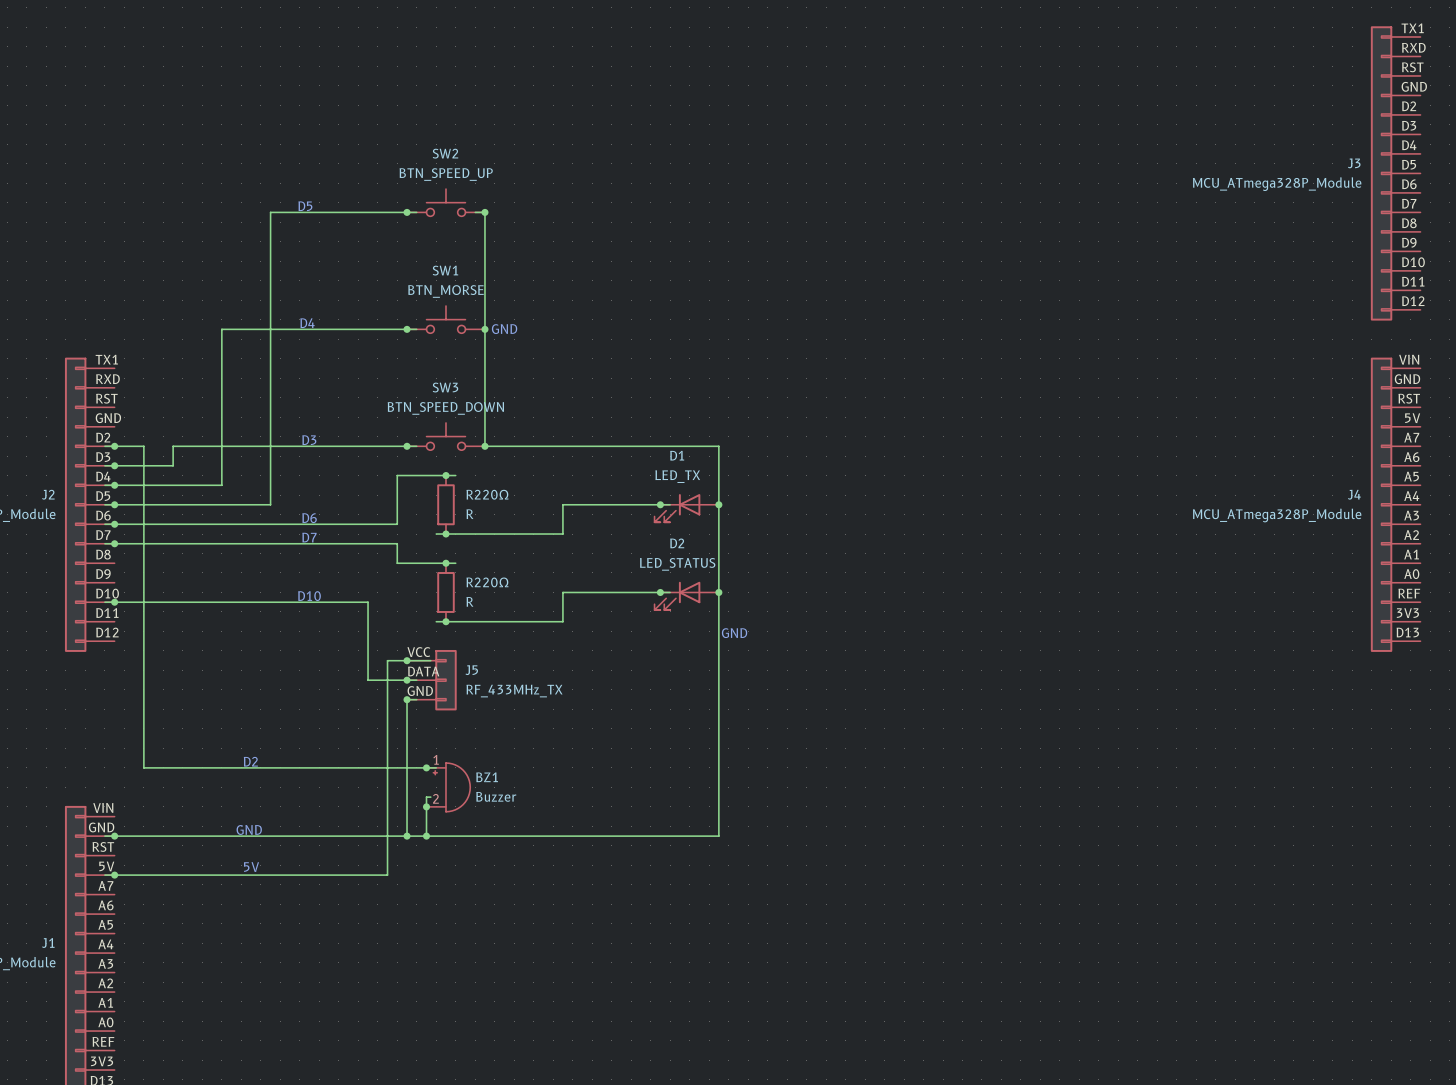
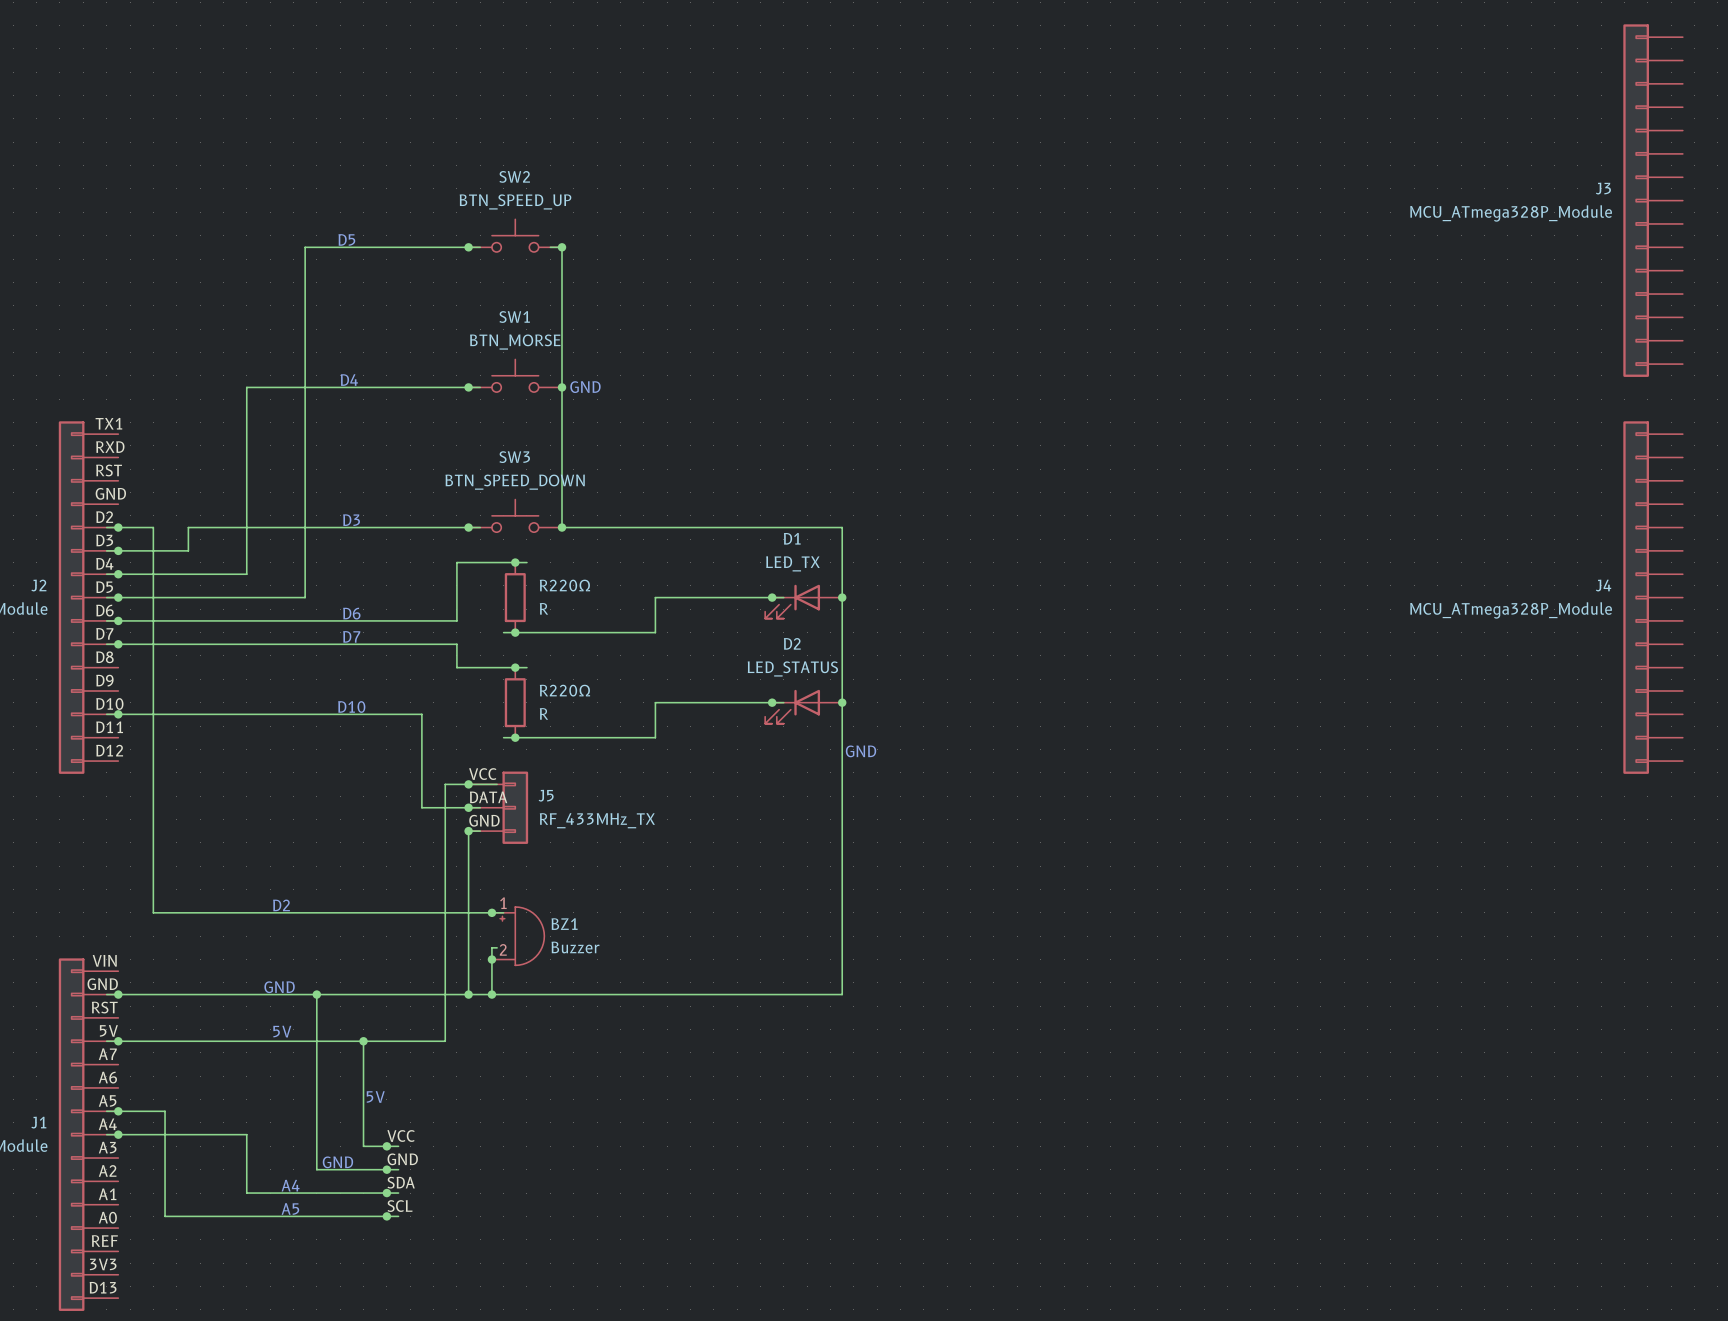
label: TX1 (1412, 28) -> none
label: RXD (1413, 47) -> none
label: RST (1412, 67) -> none
label: GND (1414, 86) -> none
label: D2 (1409, 106) -> none
label: D3 (1409, 125) -> none
label: D4 (1409, 145) -> none
label: D5 (1409, 164) -> none
label: D6 (1409, 184) -> none
label: D7 (1409, 203) -> none
label: D8 (1409, 223) -> none
label: D9 (1409, 242) -> none
label: D10 (1413, 262) -> none
label: D11 (1413, 281) -> none
label: D12 (1413, 301) -> none
label: VIN (1409, 359) -> none
label: GND (1407, 379) -> none
label: RST (1409, 398) -> none
label: 5V (1412, 418) -> none
label: A7 (1411, 437) -> none
label: A6 (1411, 457) -> none
label: A5 (1411, 476) -> none
label: A4 (1411, 496) -> none
label: A3 (1411, 515) -> none
label: A2 (1411, 535) -> none
label: A1 (1411, 554) -> none
label: A0 (1411, 574) -> none
label: REF (1409, 593) -> none
label: 3V3 (1407, 613) -> none
label: D13 (1407, 632) -> none
wire: none -> (316, 994) (316, 1169) (398, 1169)
junction: none -> (316, 994)
wire: none -> (363, 1041) (363, 1146) (398, 1146)
junction: none -> (363, 1041)
text: none -> 5V (375, 1096)
wire: none -> (106, 1111) (165, 1111) (165, 1216) (398, 1216)
junction: none -> (118, 1111)
wire: none -> (106, 1134) (246, 1134) (246, 1193) (398, 1193)
junction: none -> (118, 1134)
label: none -> VCC (401, 1135)
junction: none -> (386, 1146)
label: none -> GND (402, 1159)
text: none -> GND (337, 1162)
junction: none -> (386, 1169)
label: none -> SDA (401, 1182)
text: none -> A4 (290, 1185)
junction: none -> (386, 1193)
label: none -> SCL (400, 1206)
text: none -> A5 (290, 1208)
junction: none -> (386, 1216)

